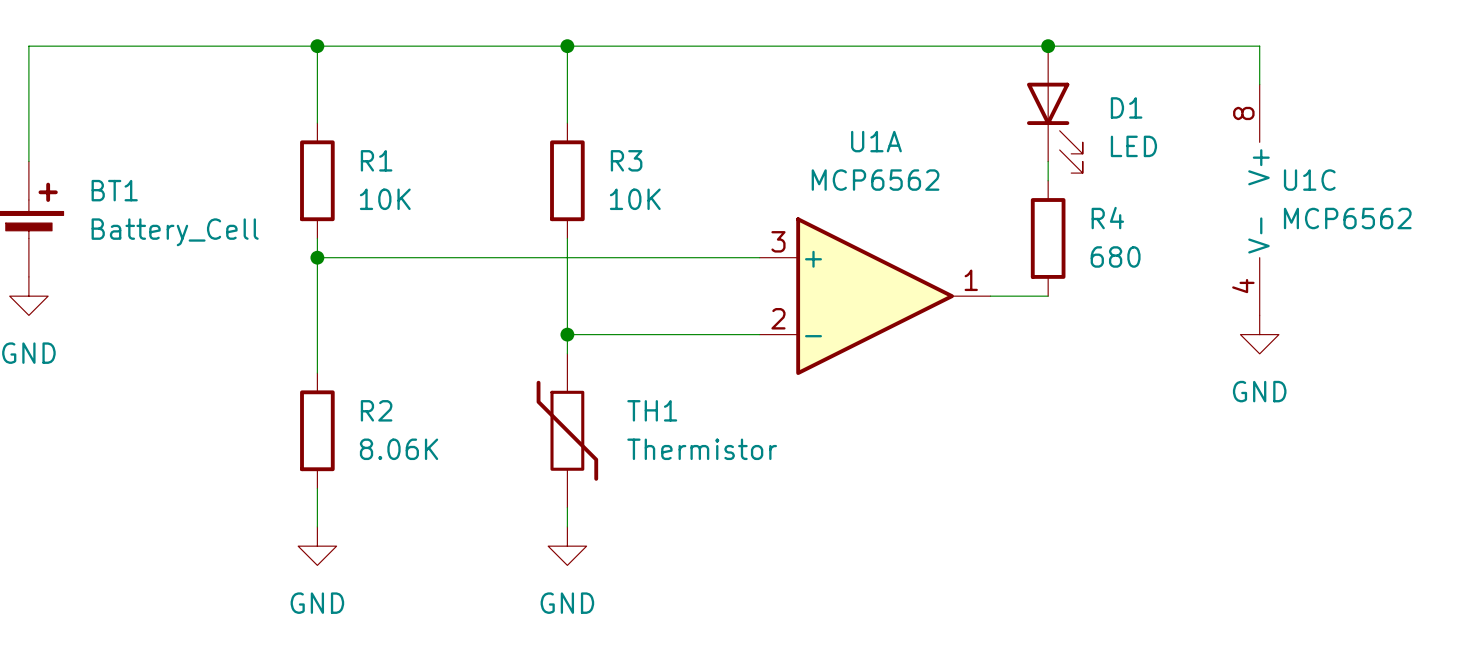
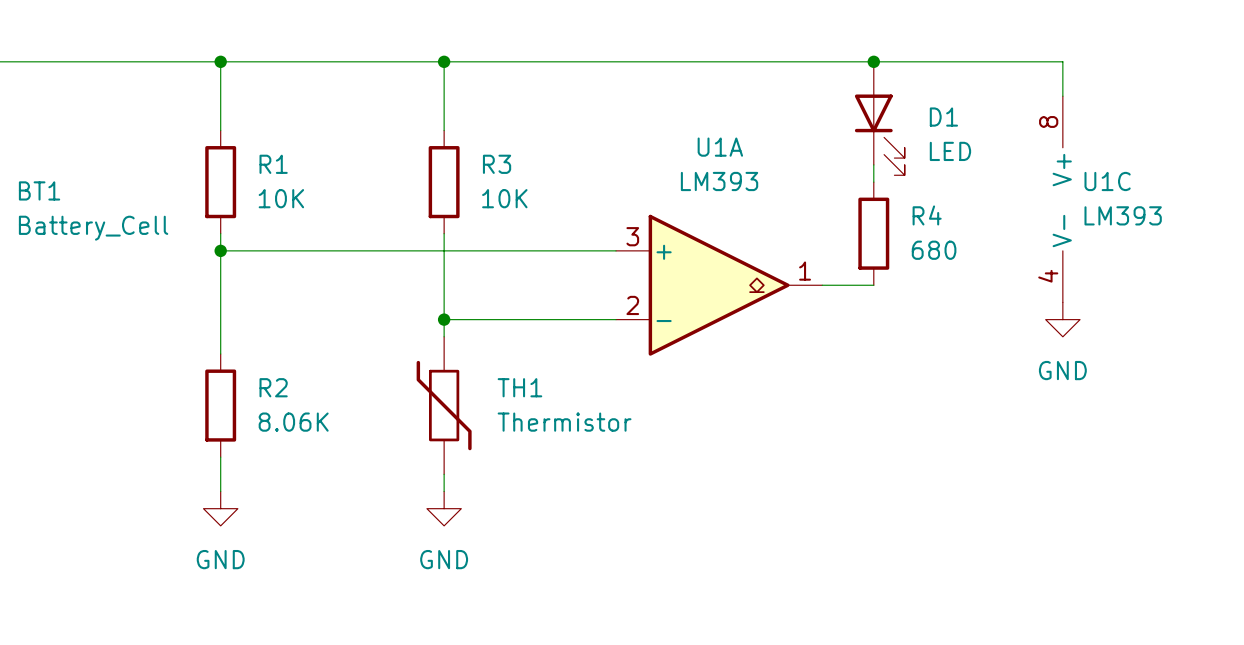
U1A value: MCP6562 (875, 180) -> LM393 (719, 181)
U1A symbol: [759, 217, 991, 376] -> [615, 214, 823, 356]
U1C value: MCP6562 (1347, 218) -> LM393 (1123, 215)

